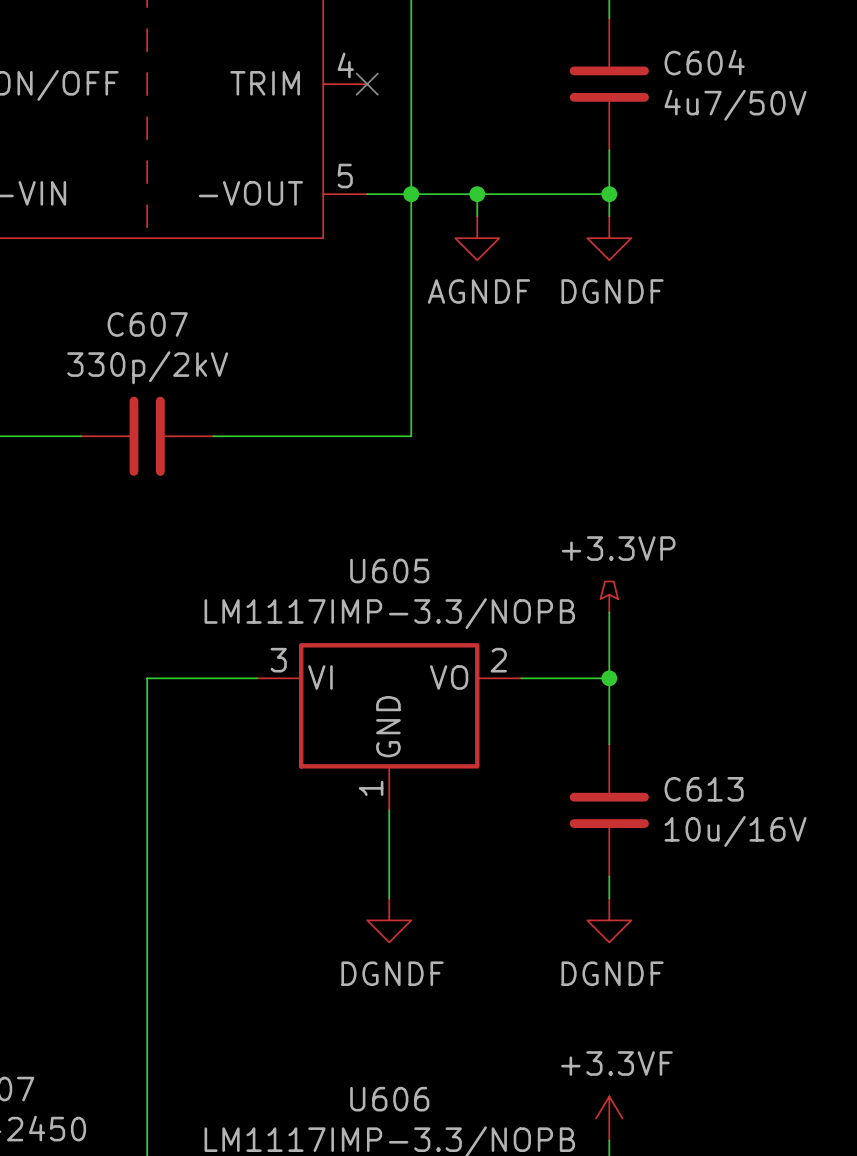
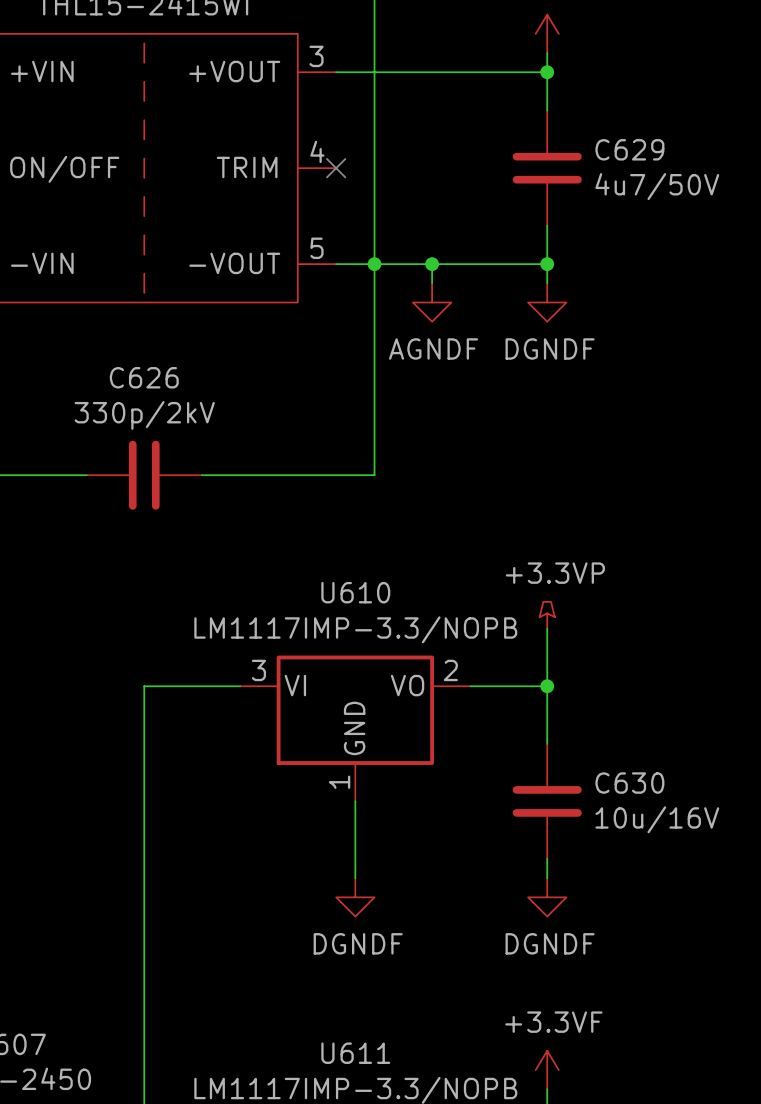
C604 name: C604 (704, 62) -> C629 (629, 149)
C607 name: C607 (147, 324) -> C626 (144, 377)
U605 name: U605 (389, 570) -> U610 (355, 592)
C613 name: C613 (704, 789) -> C630 (629, 783)
U606 name: U606 (389, 1099) -> U611 (355, 1053)

